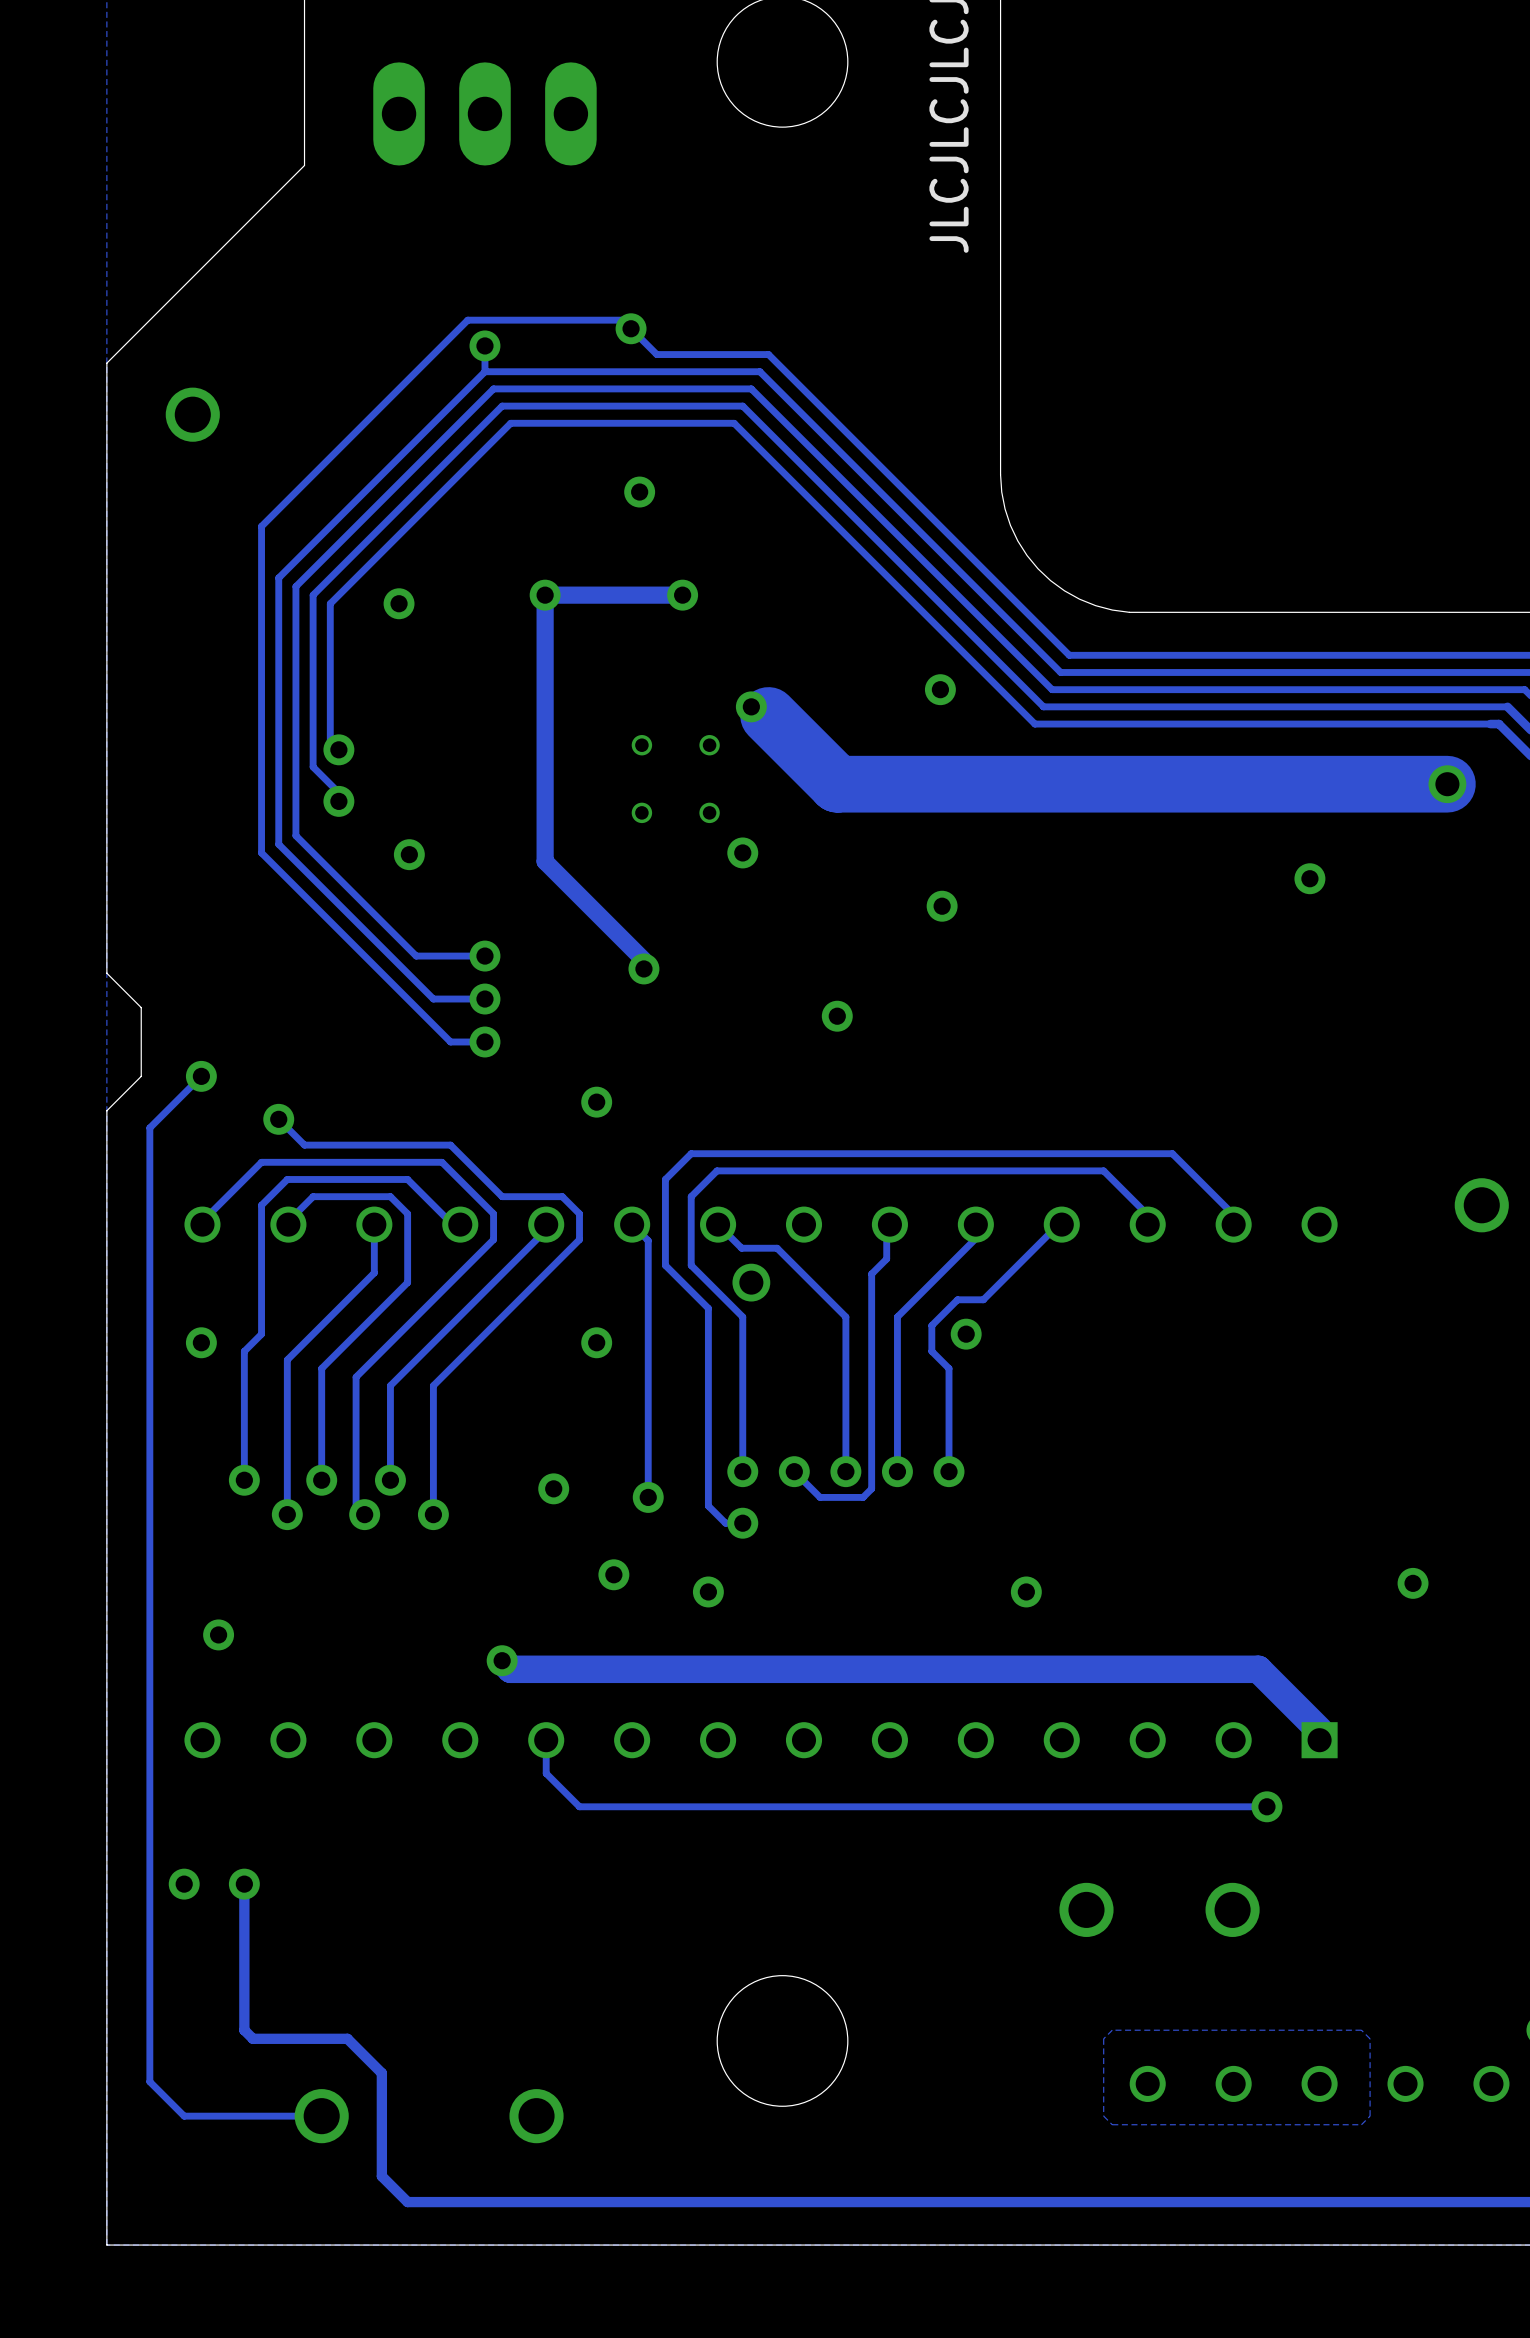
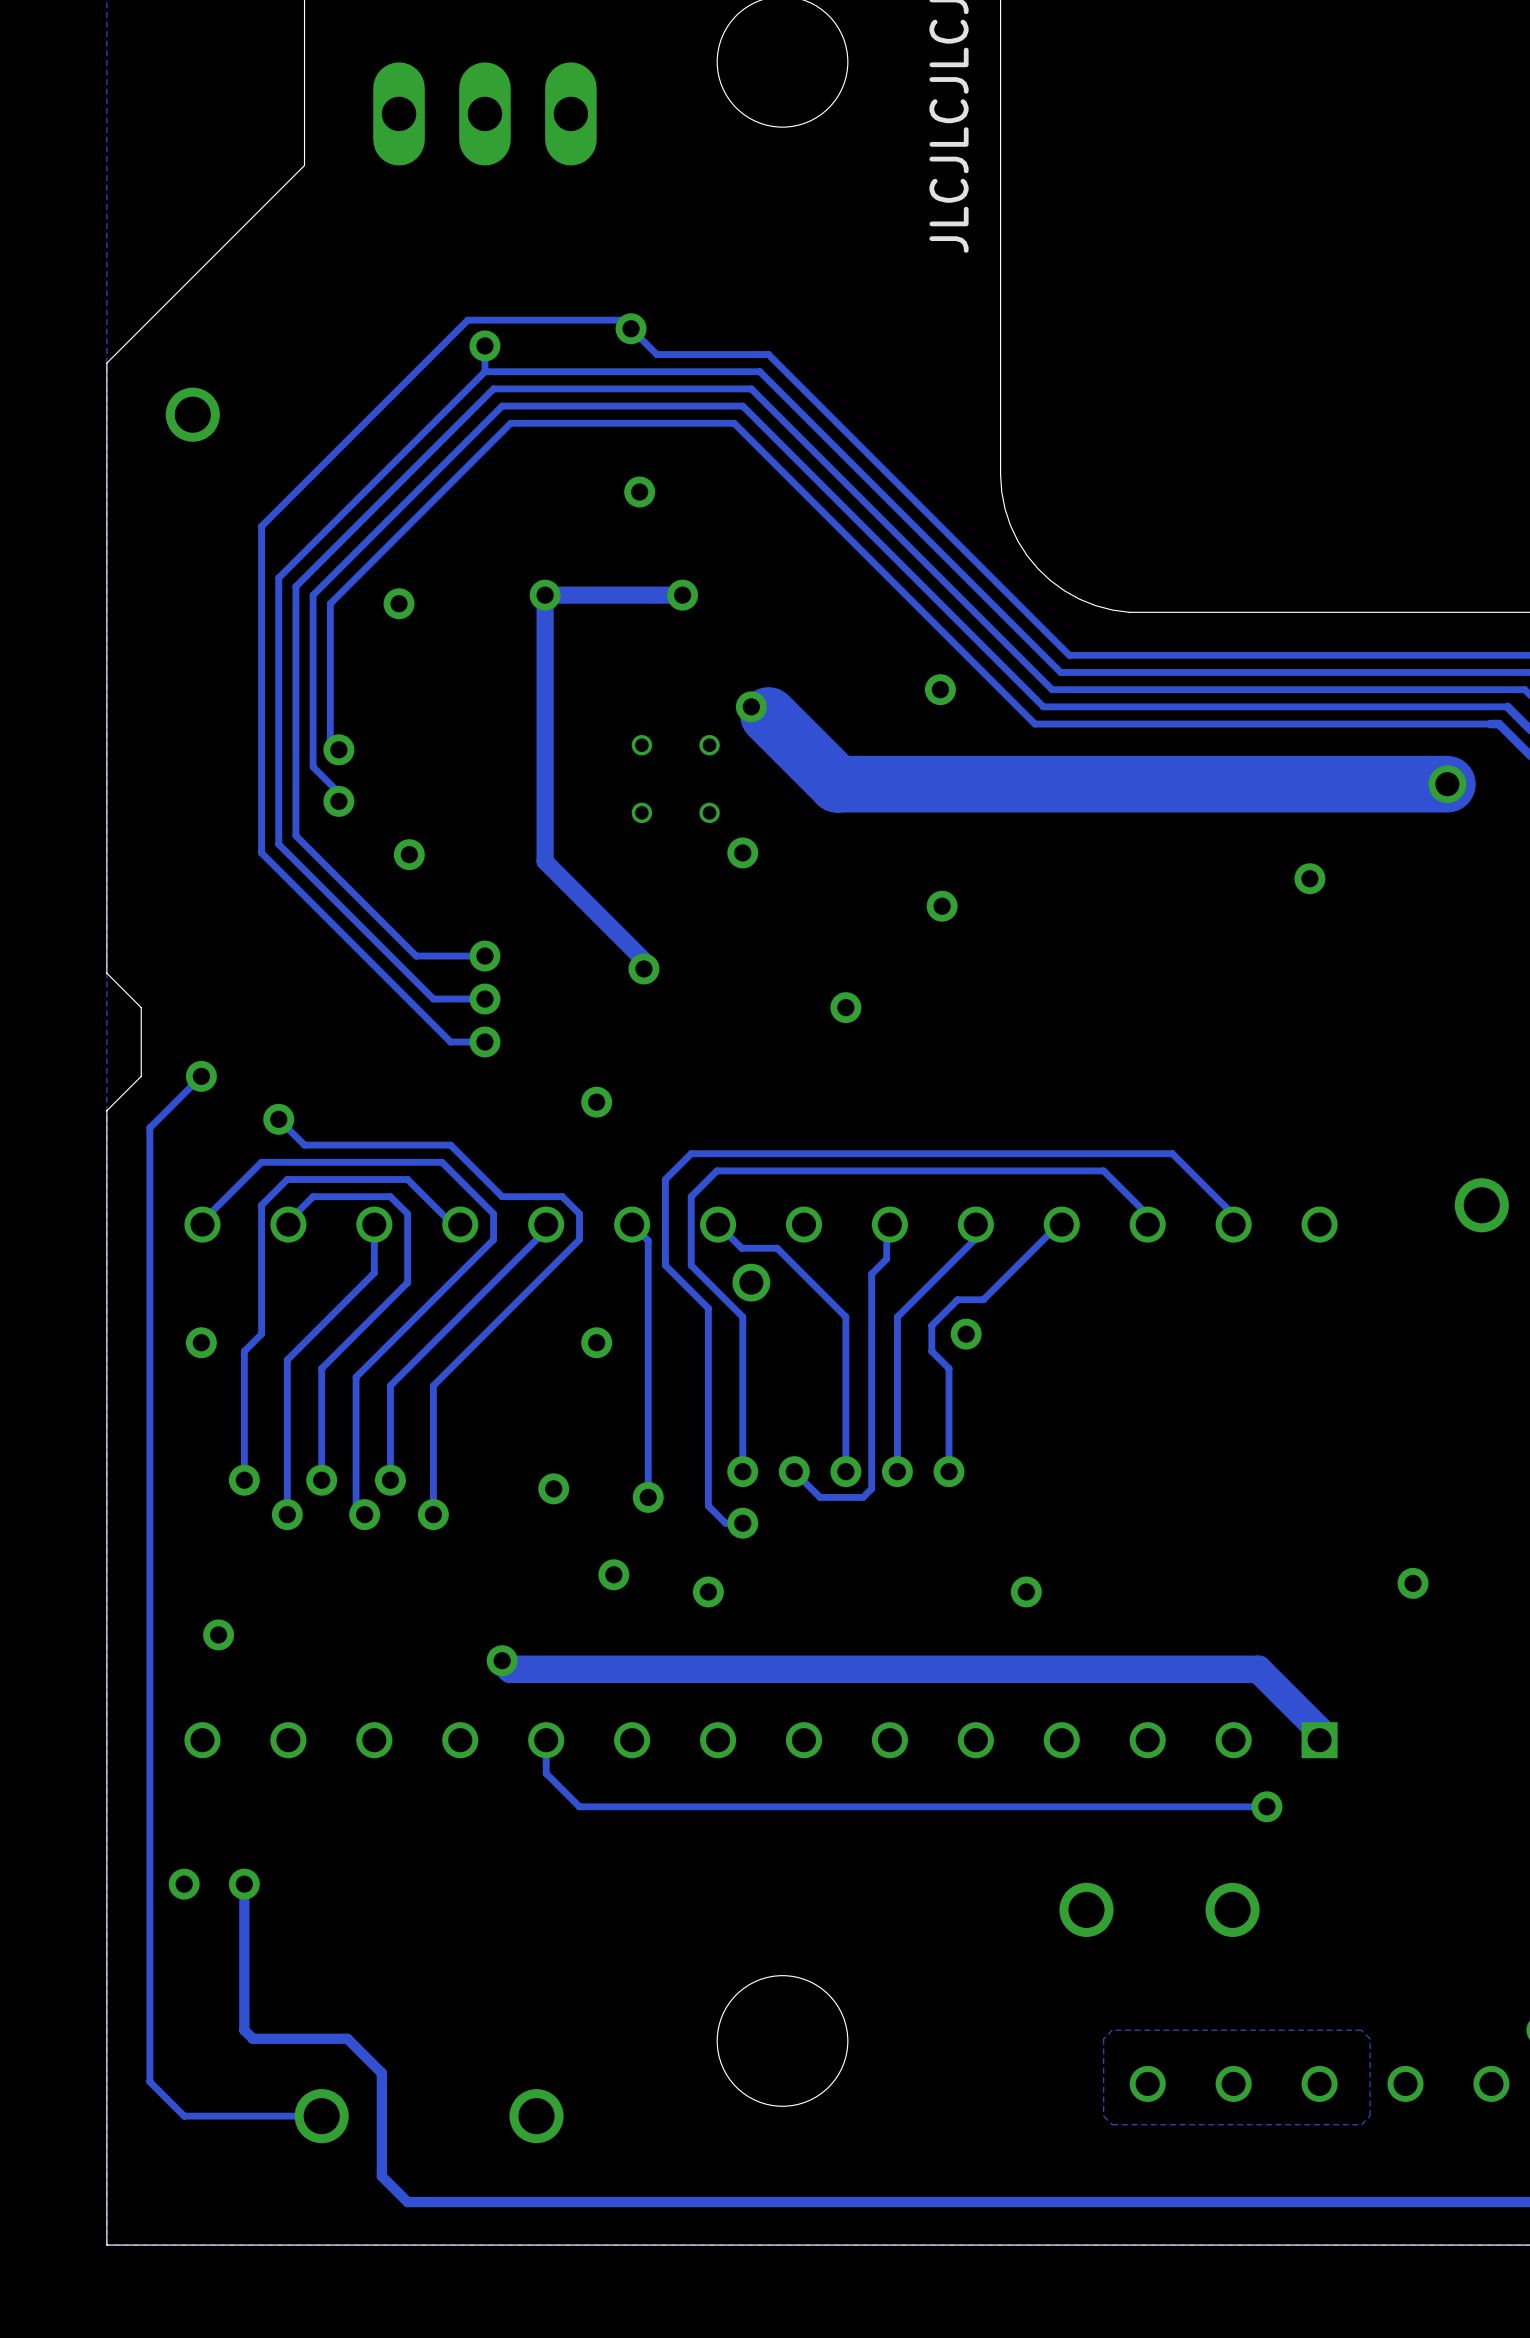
via position: (837, 1016) -> (845, 1007)

